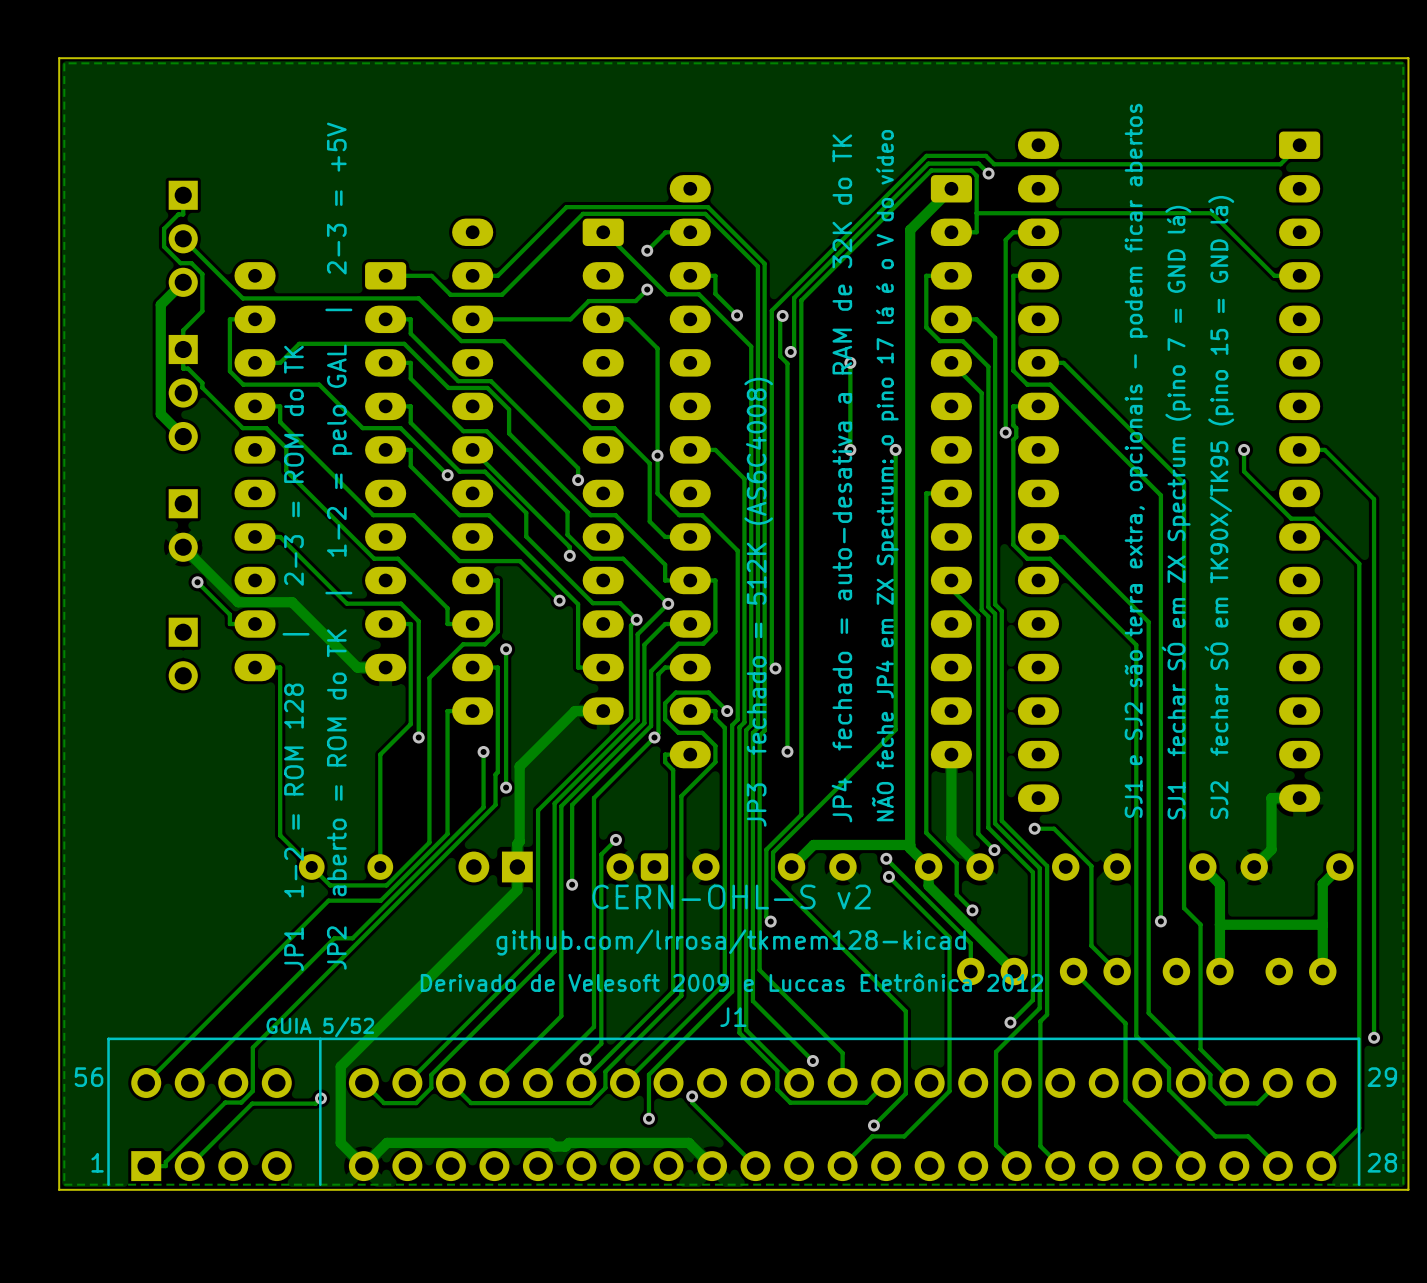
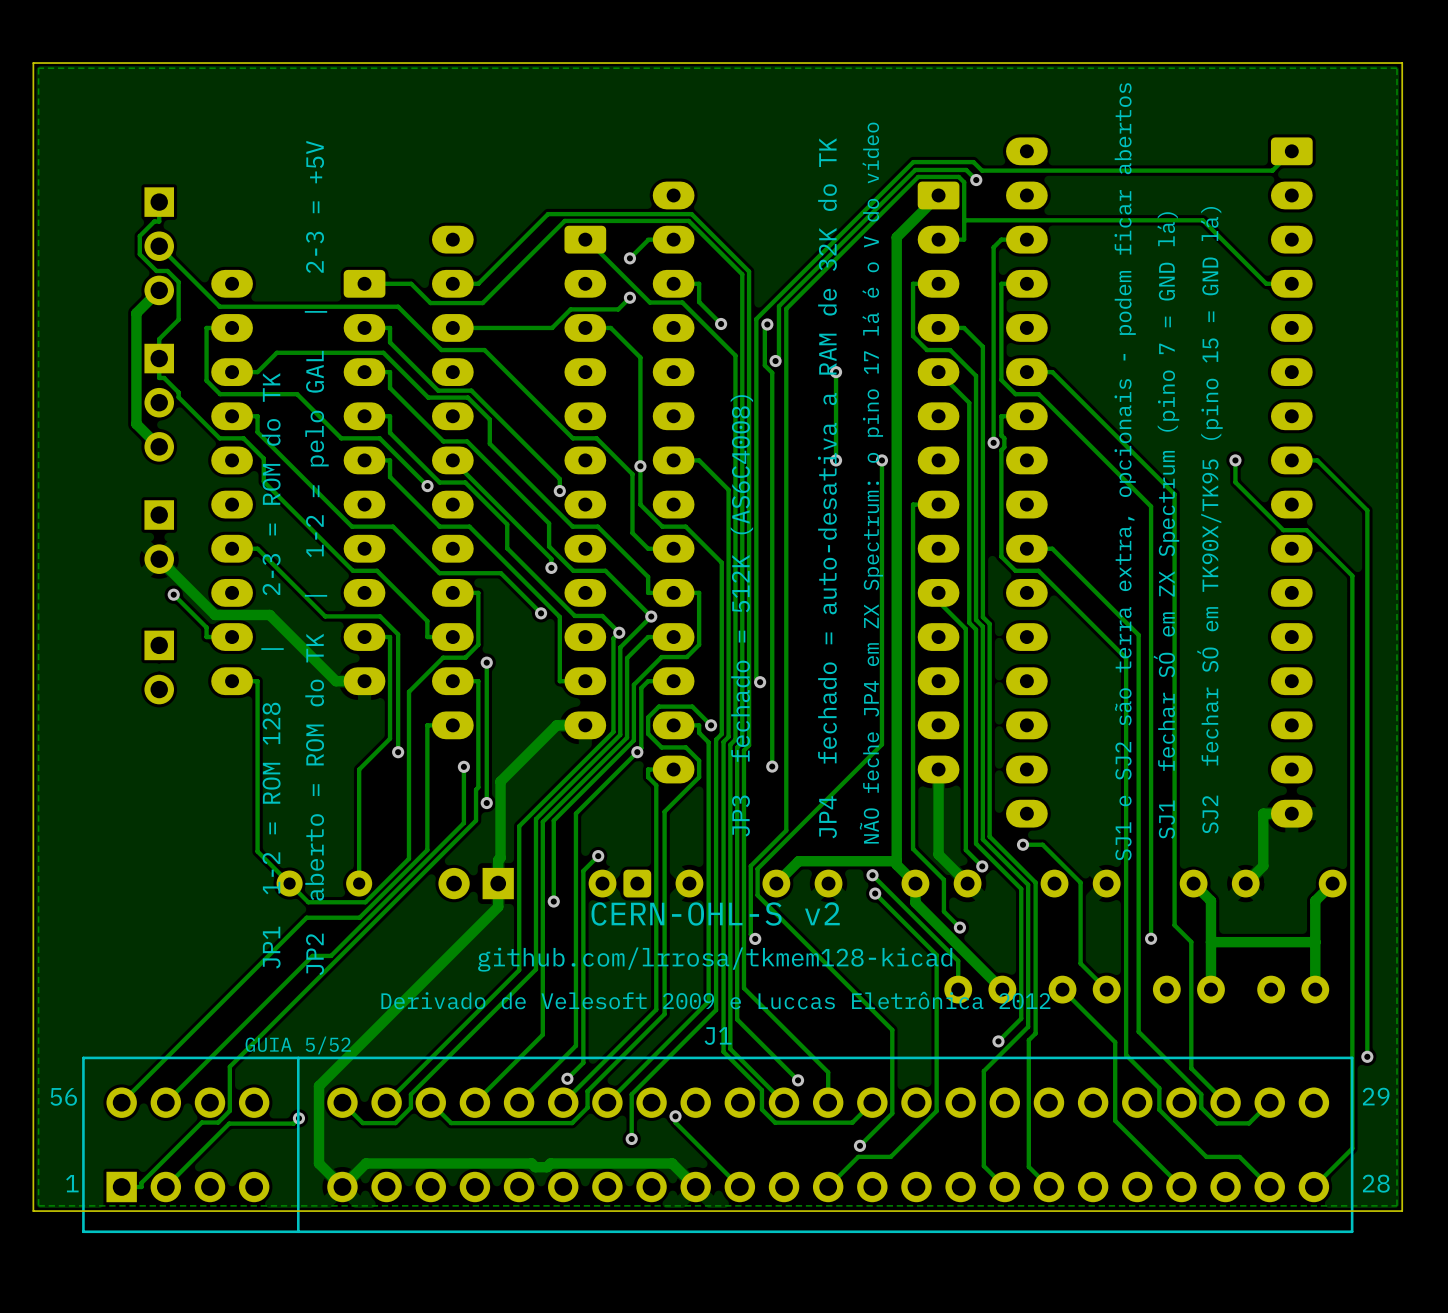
J1 footprint: [107, 1037, 1361, 1186] -> [82, 1056, 1354, 1234]

